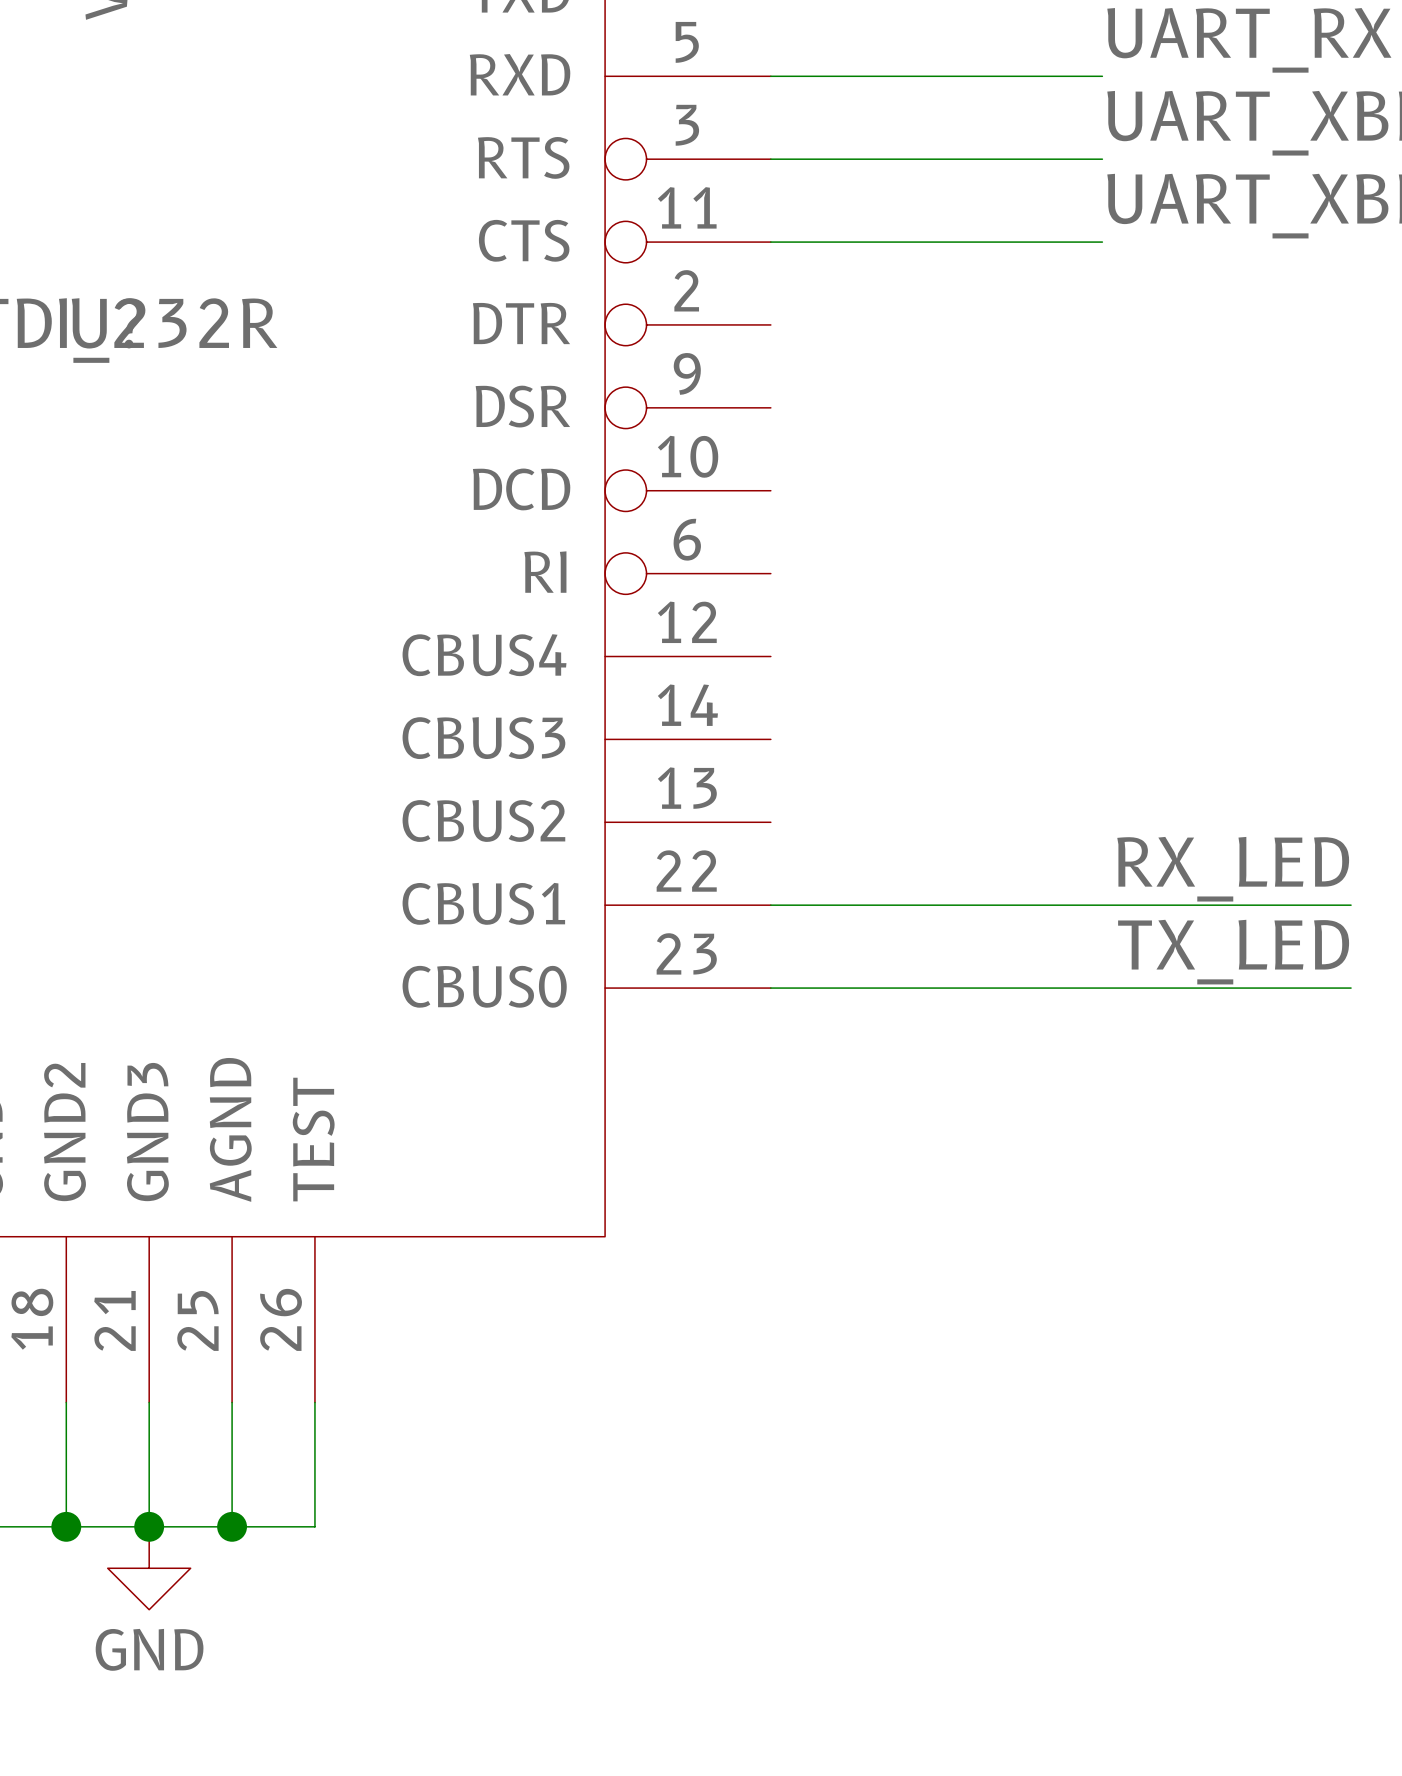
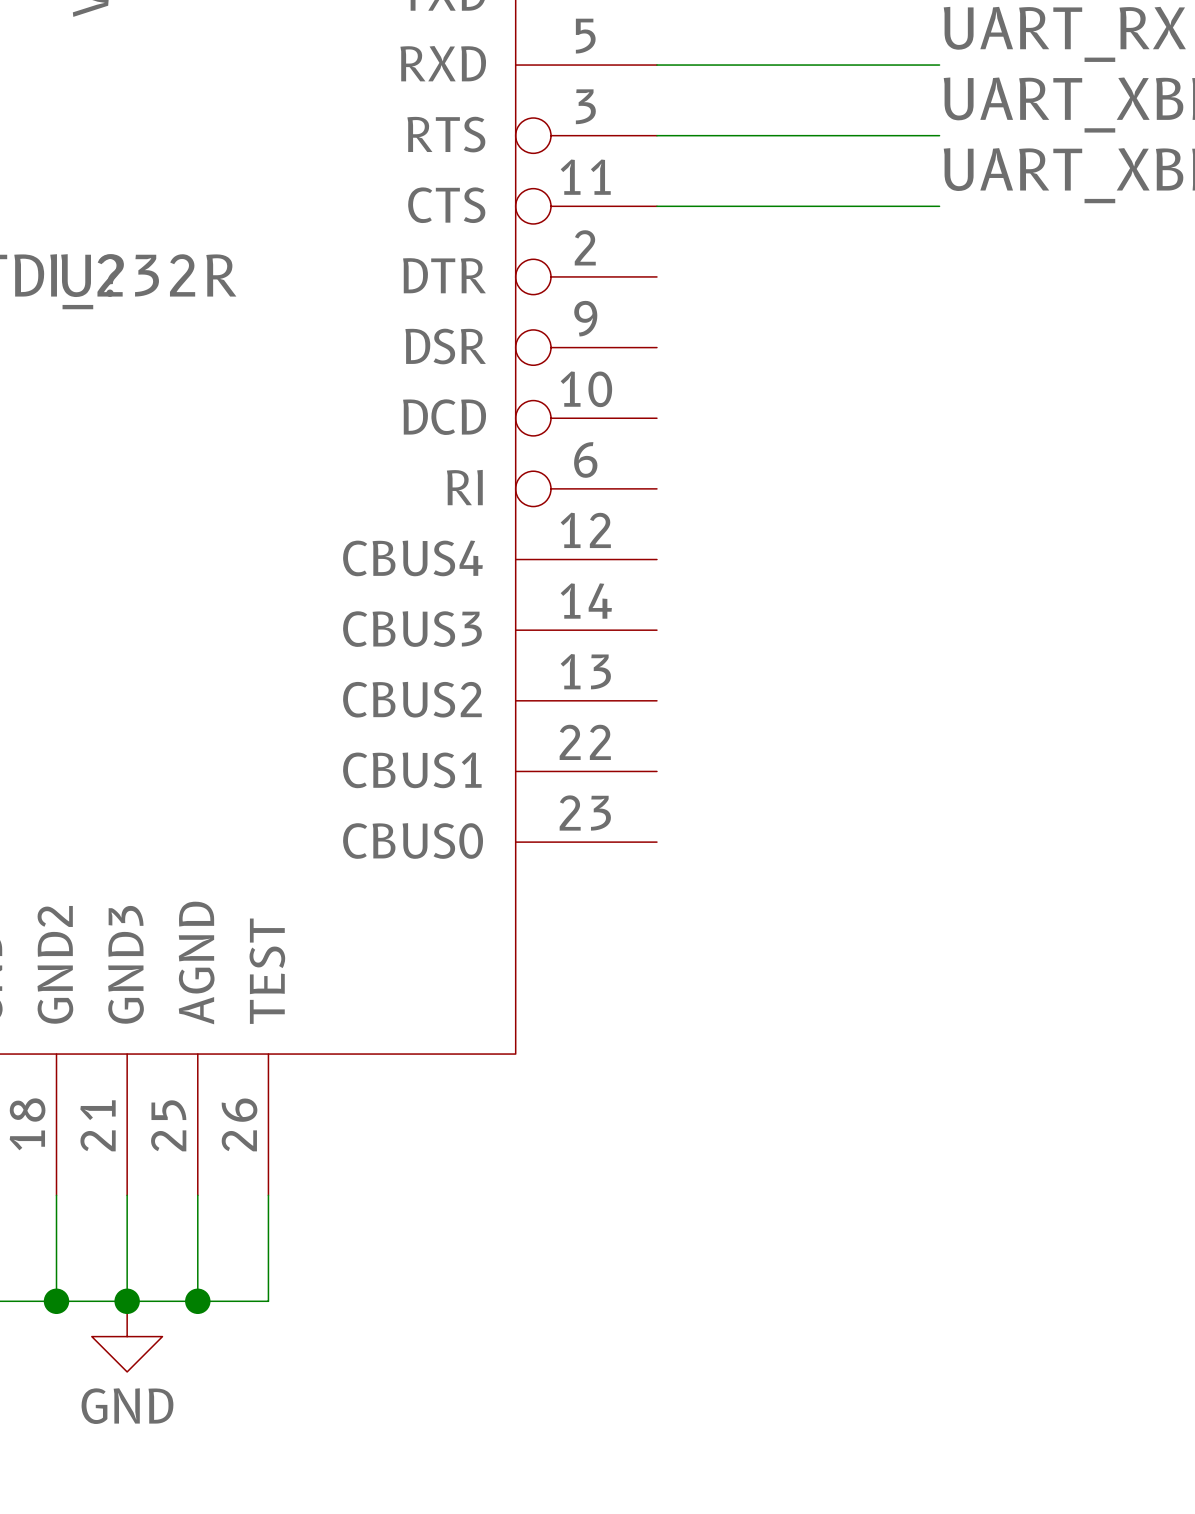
label: RX_LED (1233, 869) -> none
wire: (770, 905) (1351, 905) -> none
label: TX_LED (1233, 952) -> none
wire: (770, 988) (1351, 988) -> none

